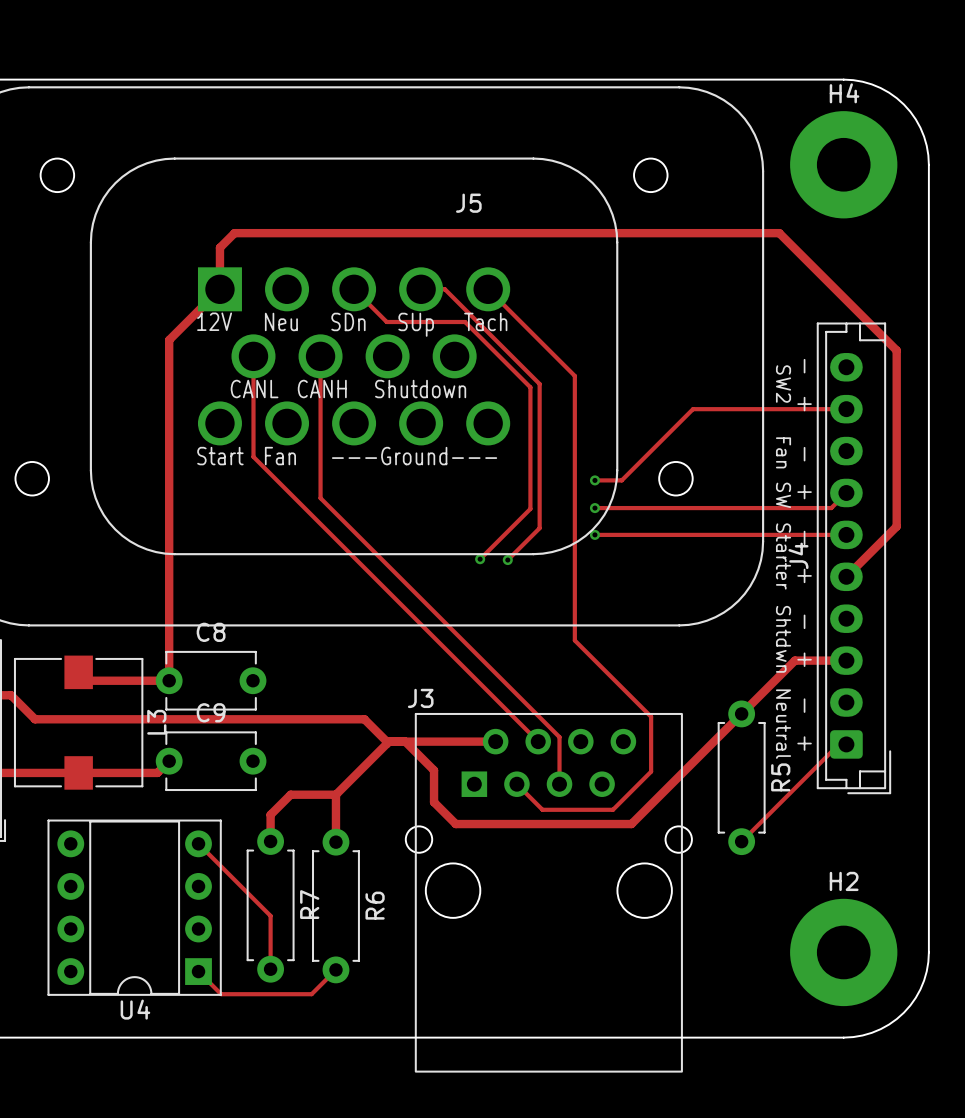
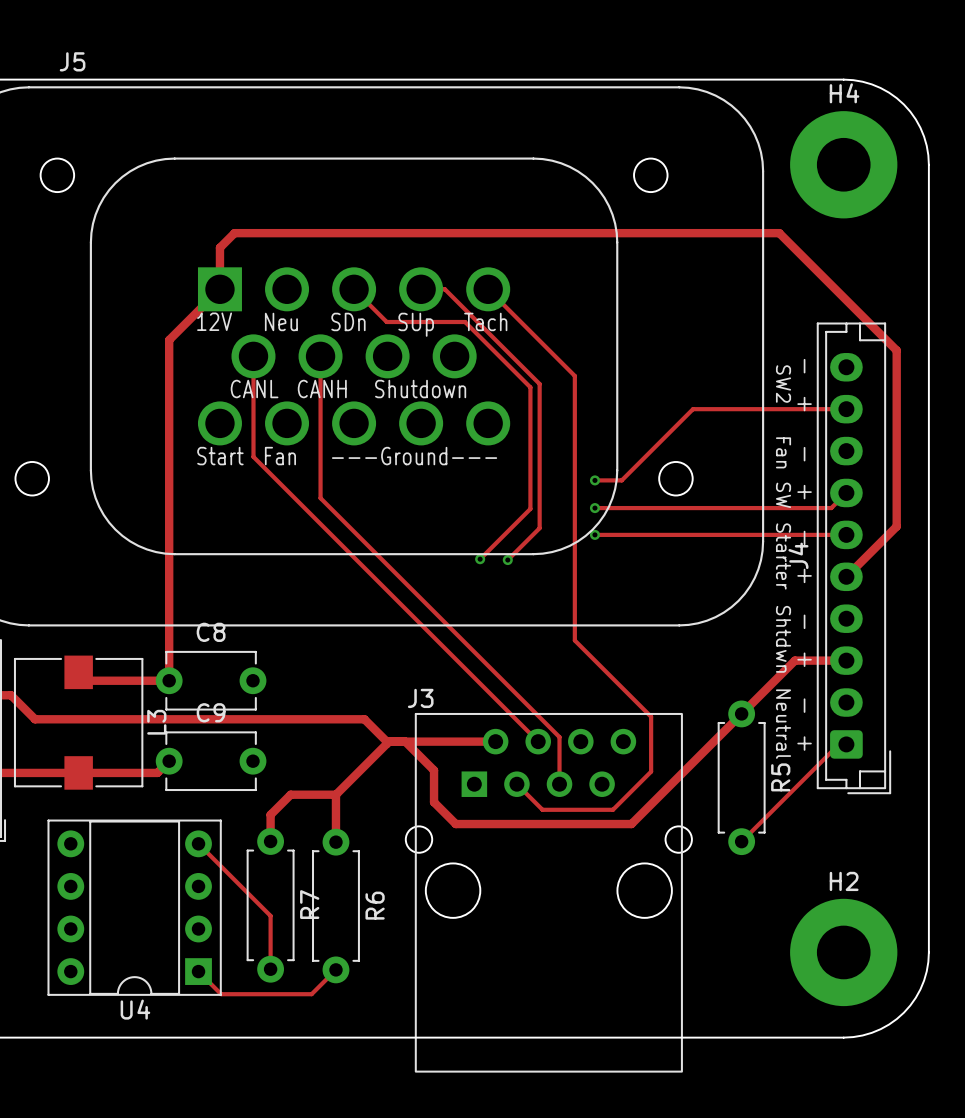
J5 name position: J5 (468, 203) -> J5 (72, 61)

